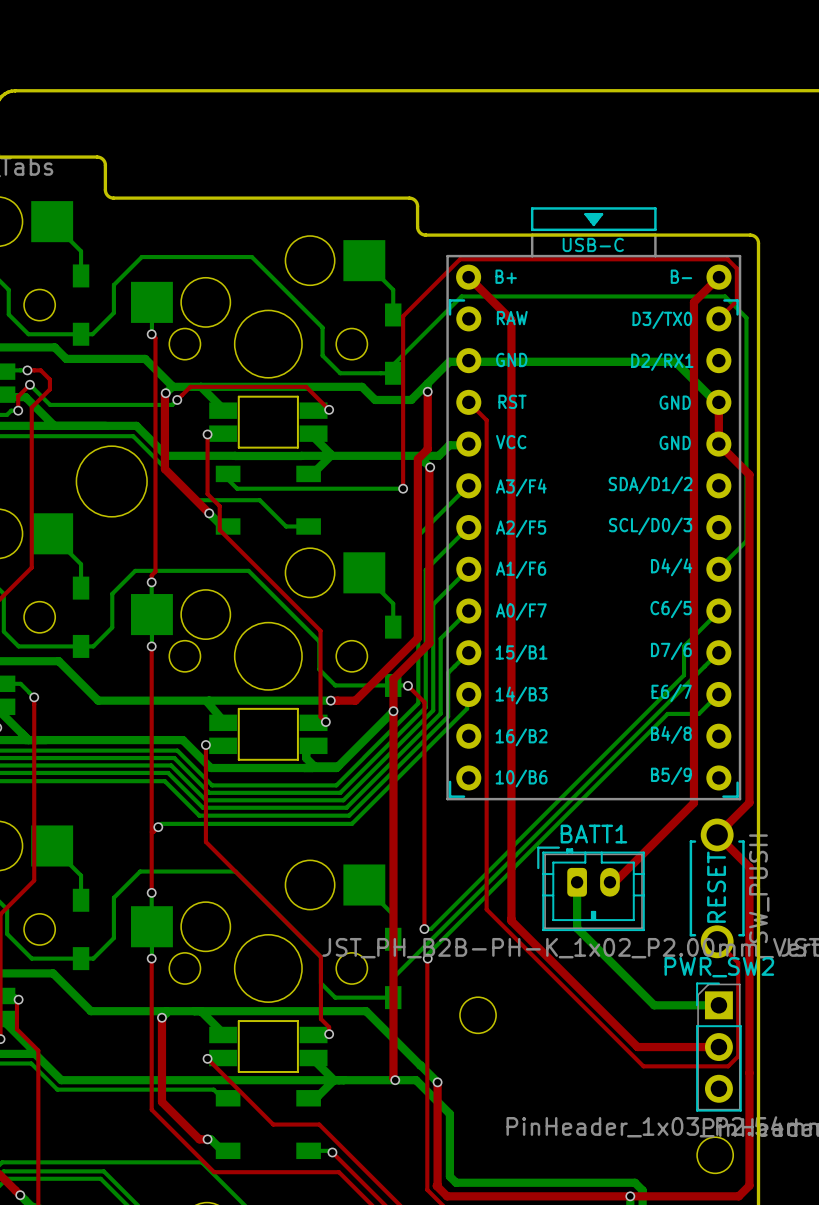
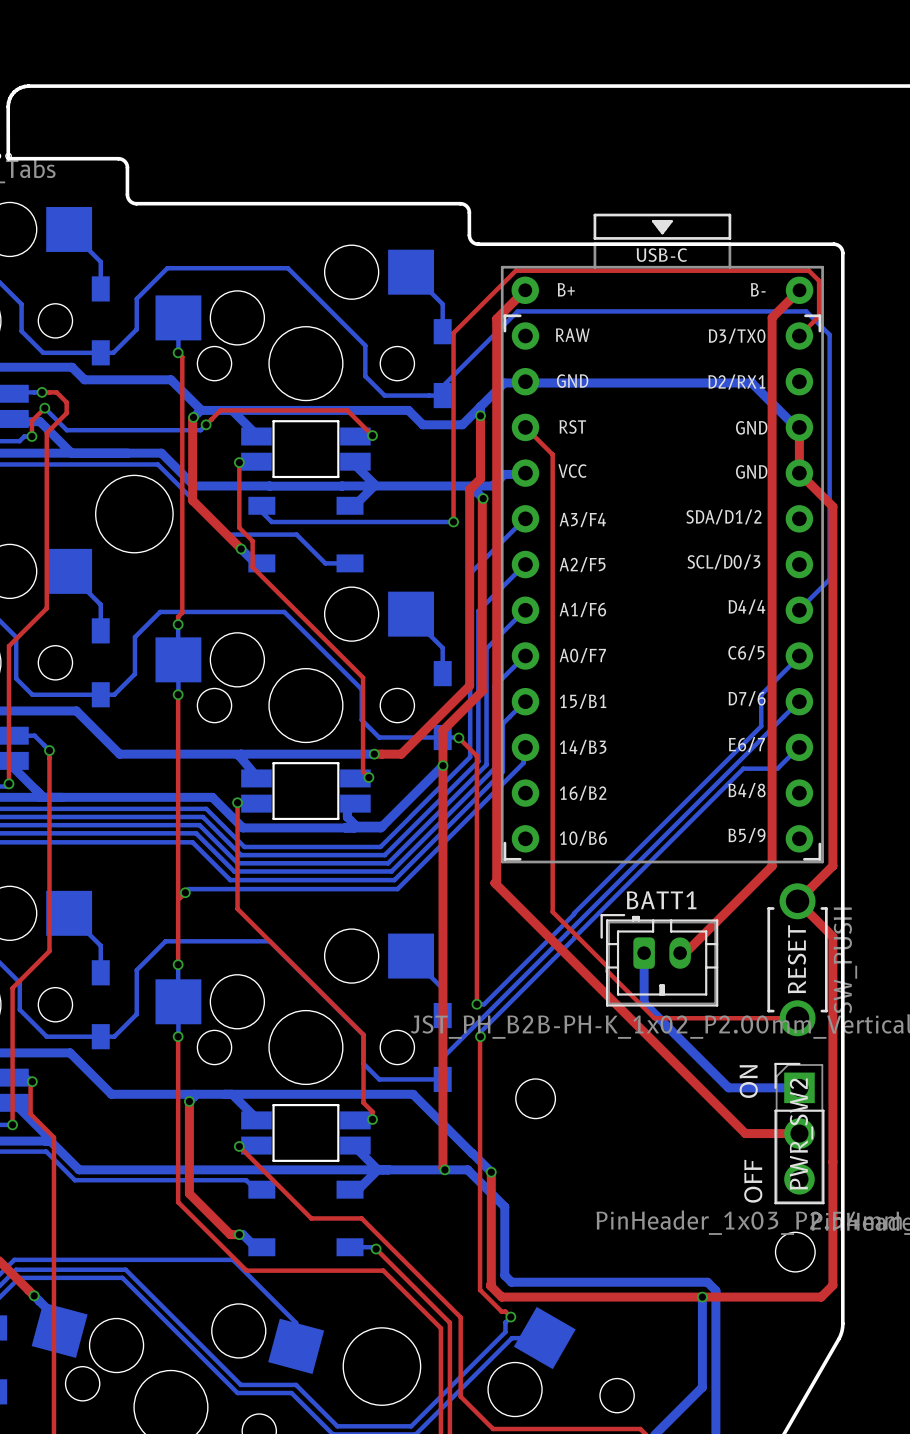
top track: (468, 277) (511, 320) (511, 920) (637, 1047) (669, 1047) -> (525, 290) (496, 318) (496, 881) (494, 883) (745, 1133)
top track: (486, 420) (486, 909) (643, 1066) (728, 1066) (738, 1056) (738, 962) (717, 941) -> (545, 446) (552, 454) (552, 911) (607, 966) (607, 971) (654, 1018) (797, 1018)
PWR_SW2 name rotation: 0° (719, 967) -> 90° counterclockwise (801, 1134)
text: none -> ON (748, 1081)
text: none -> OFF (753, 1181)

